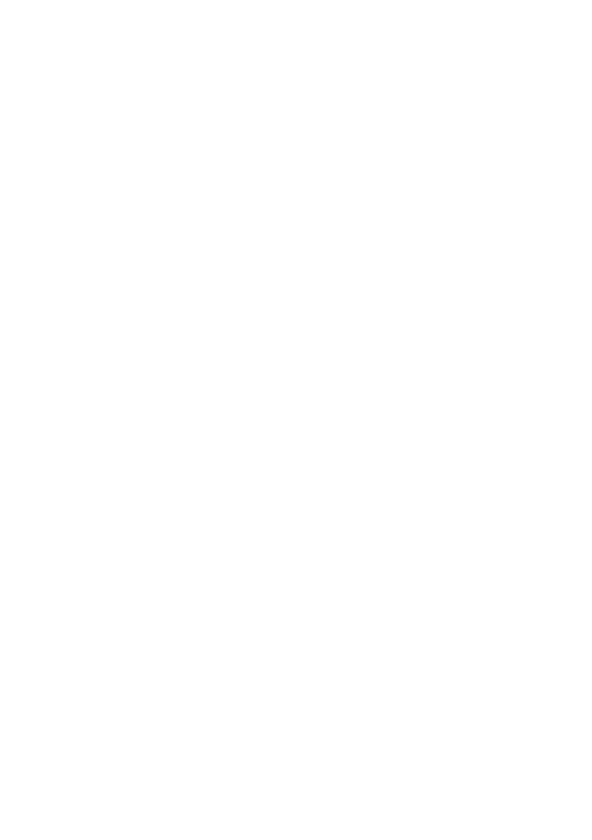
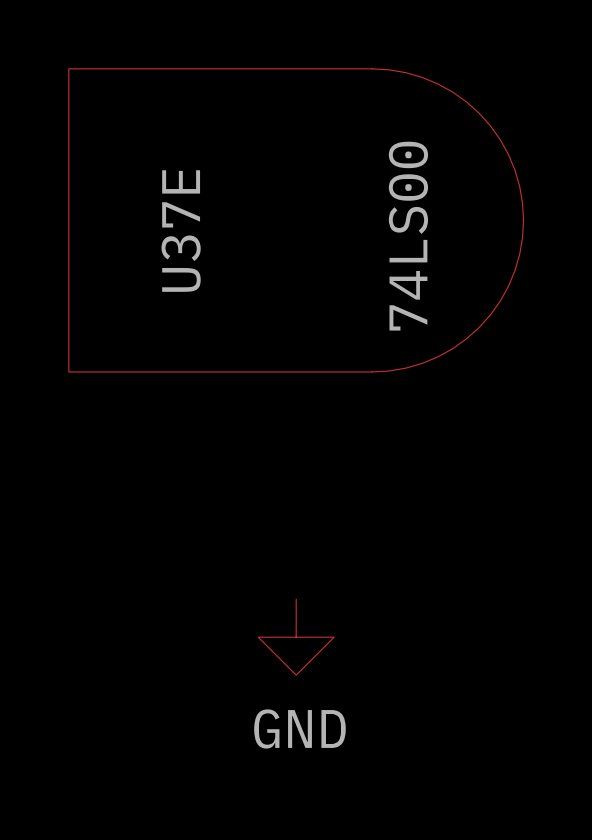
U37E: none -> 74LS00 (296, 220)
power symbol: none -> GND (296, 637)

